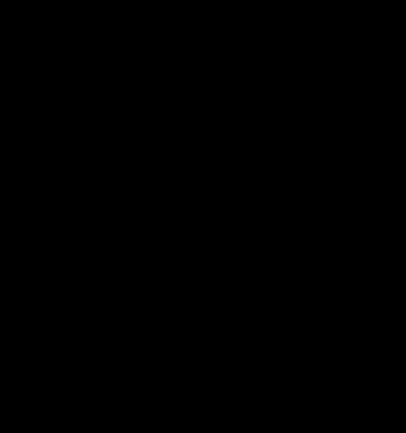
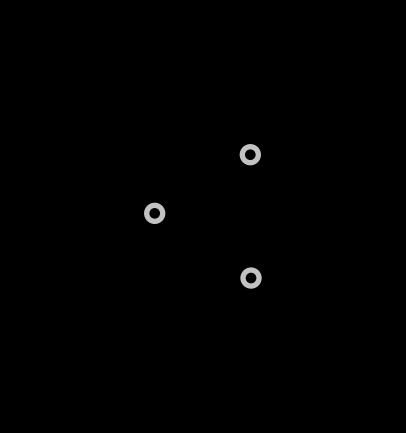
via: none -> (250, 154)
via: none -> (154, 213)
via: none -> (251, 278)

